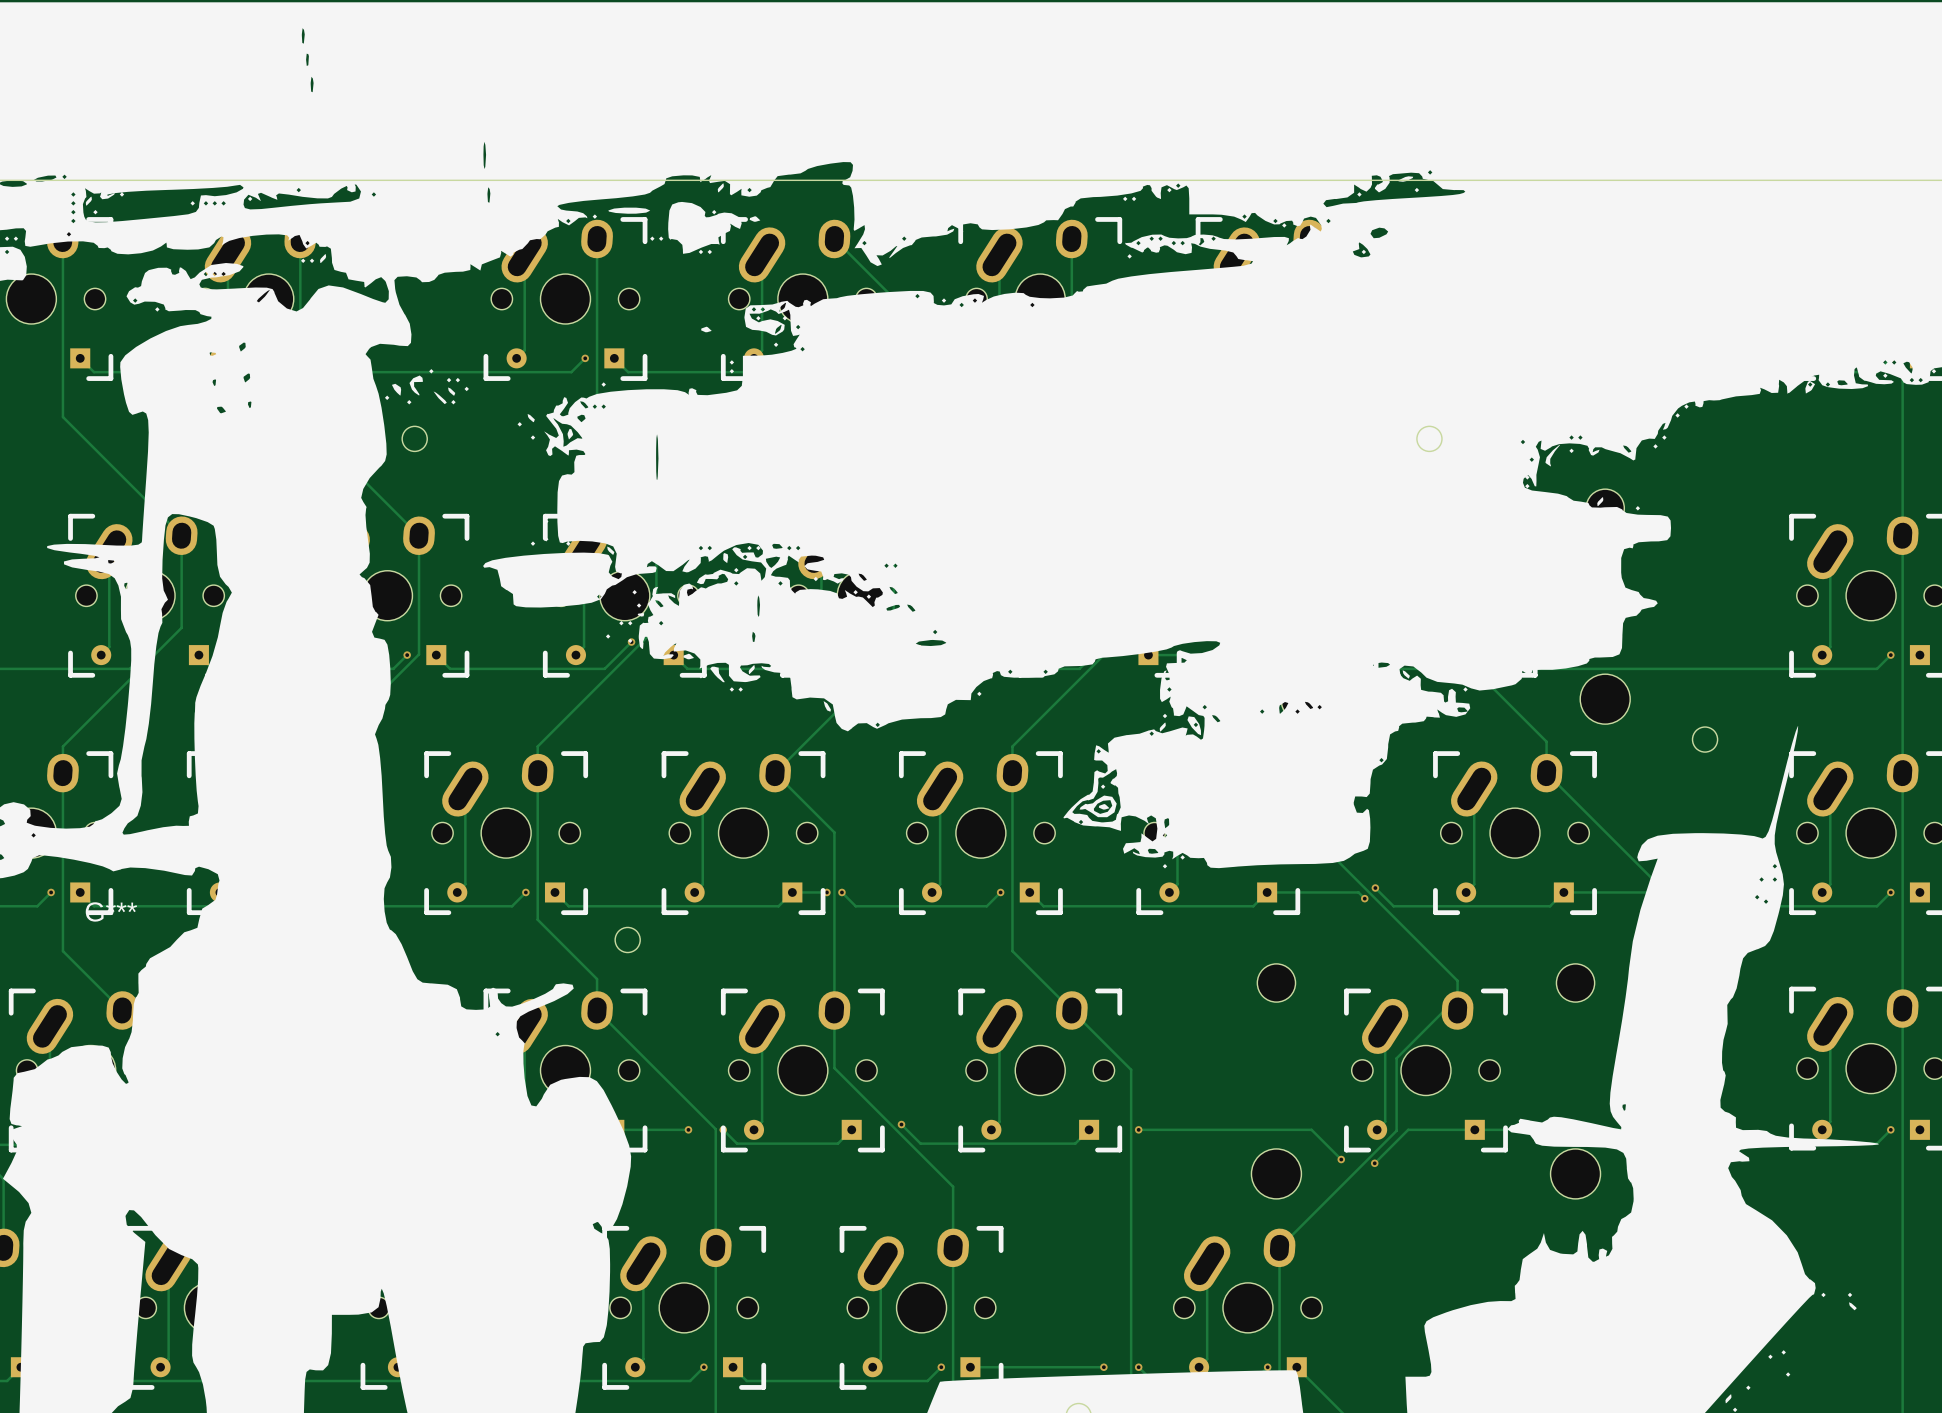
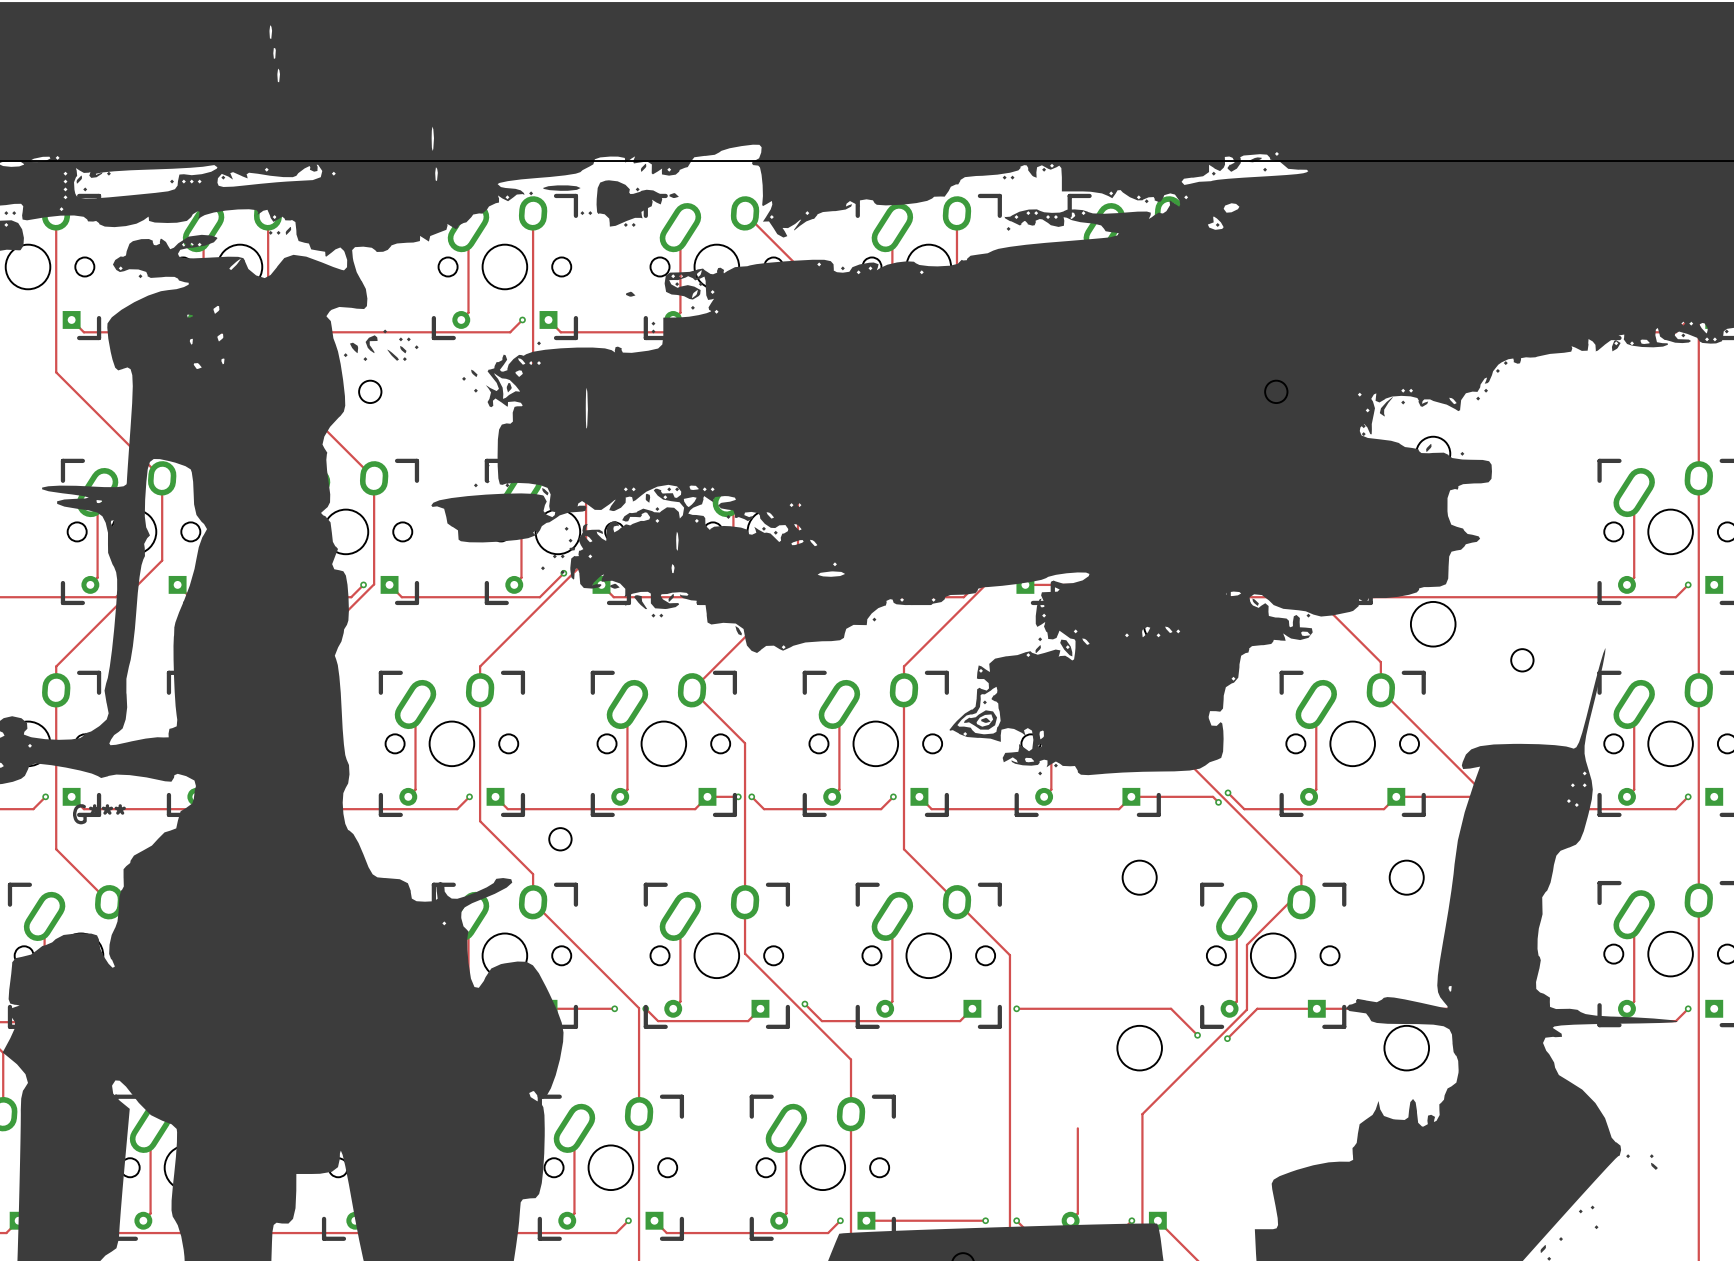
part: (1247, 1280) -> none

